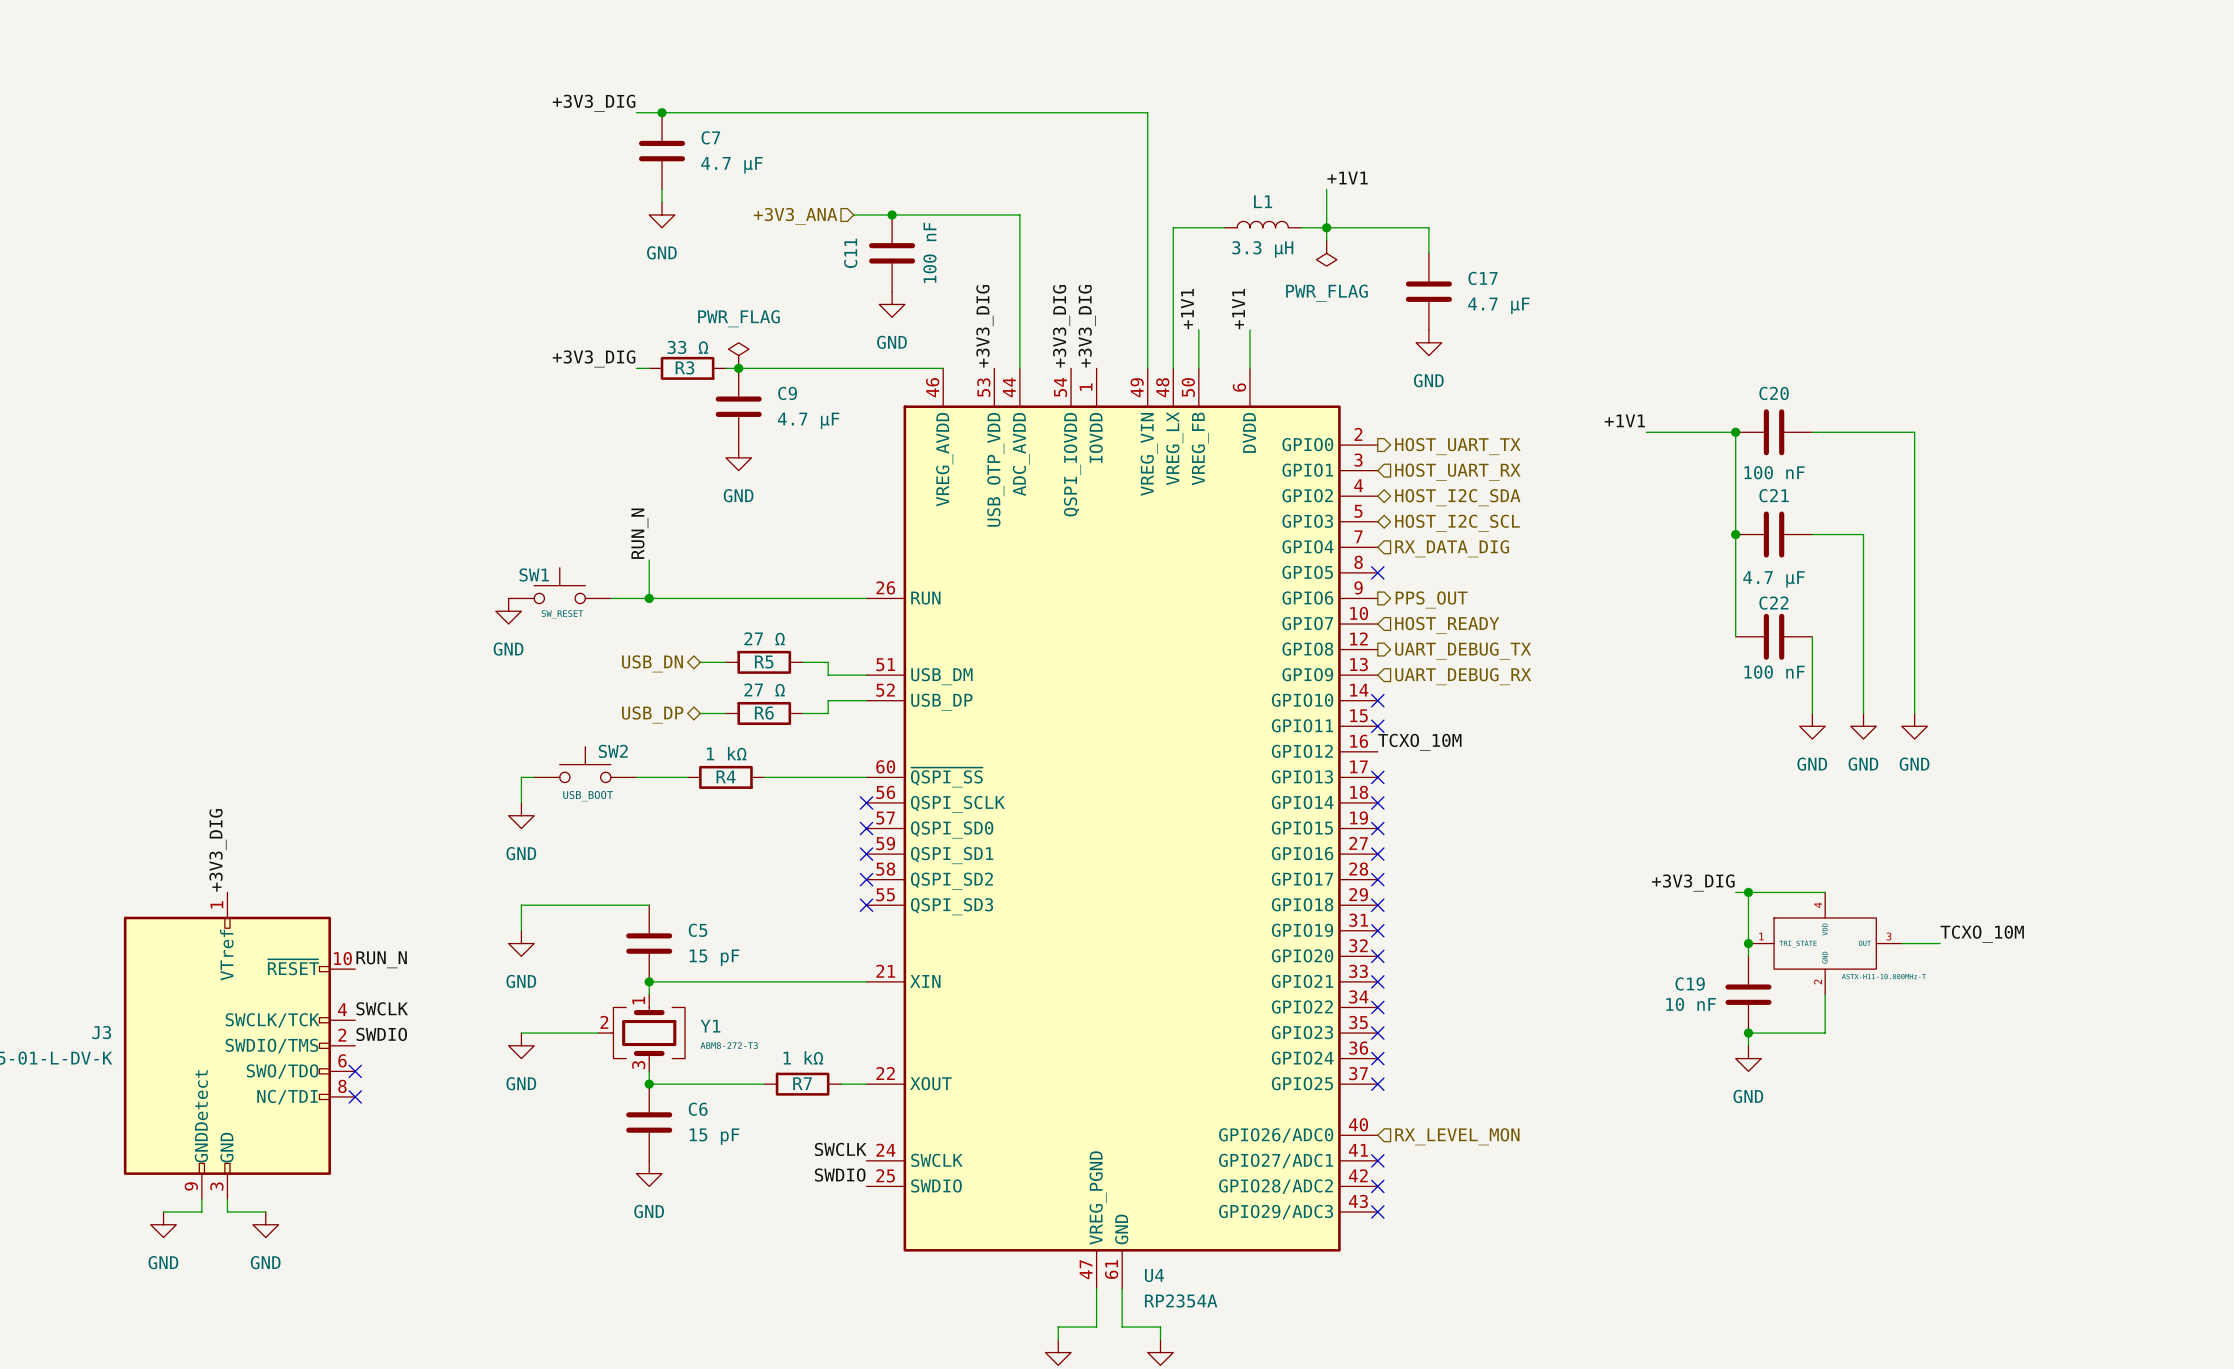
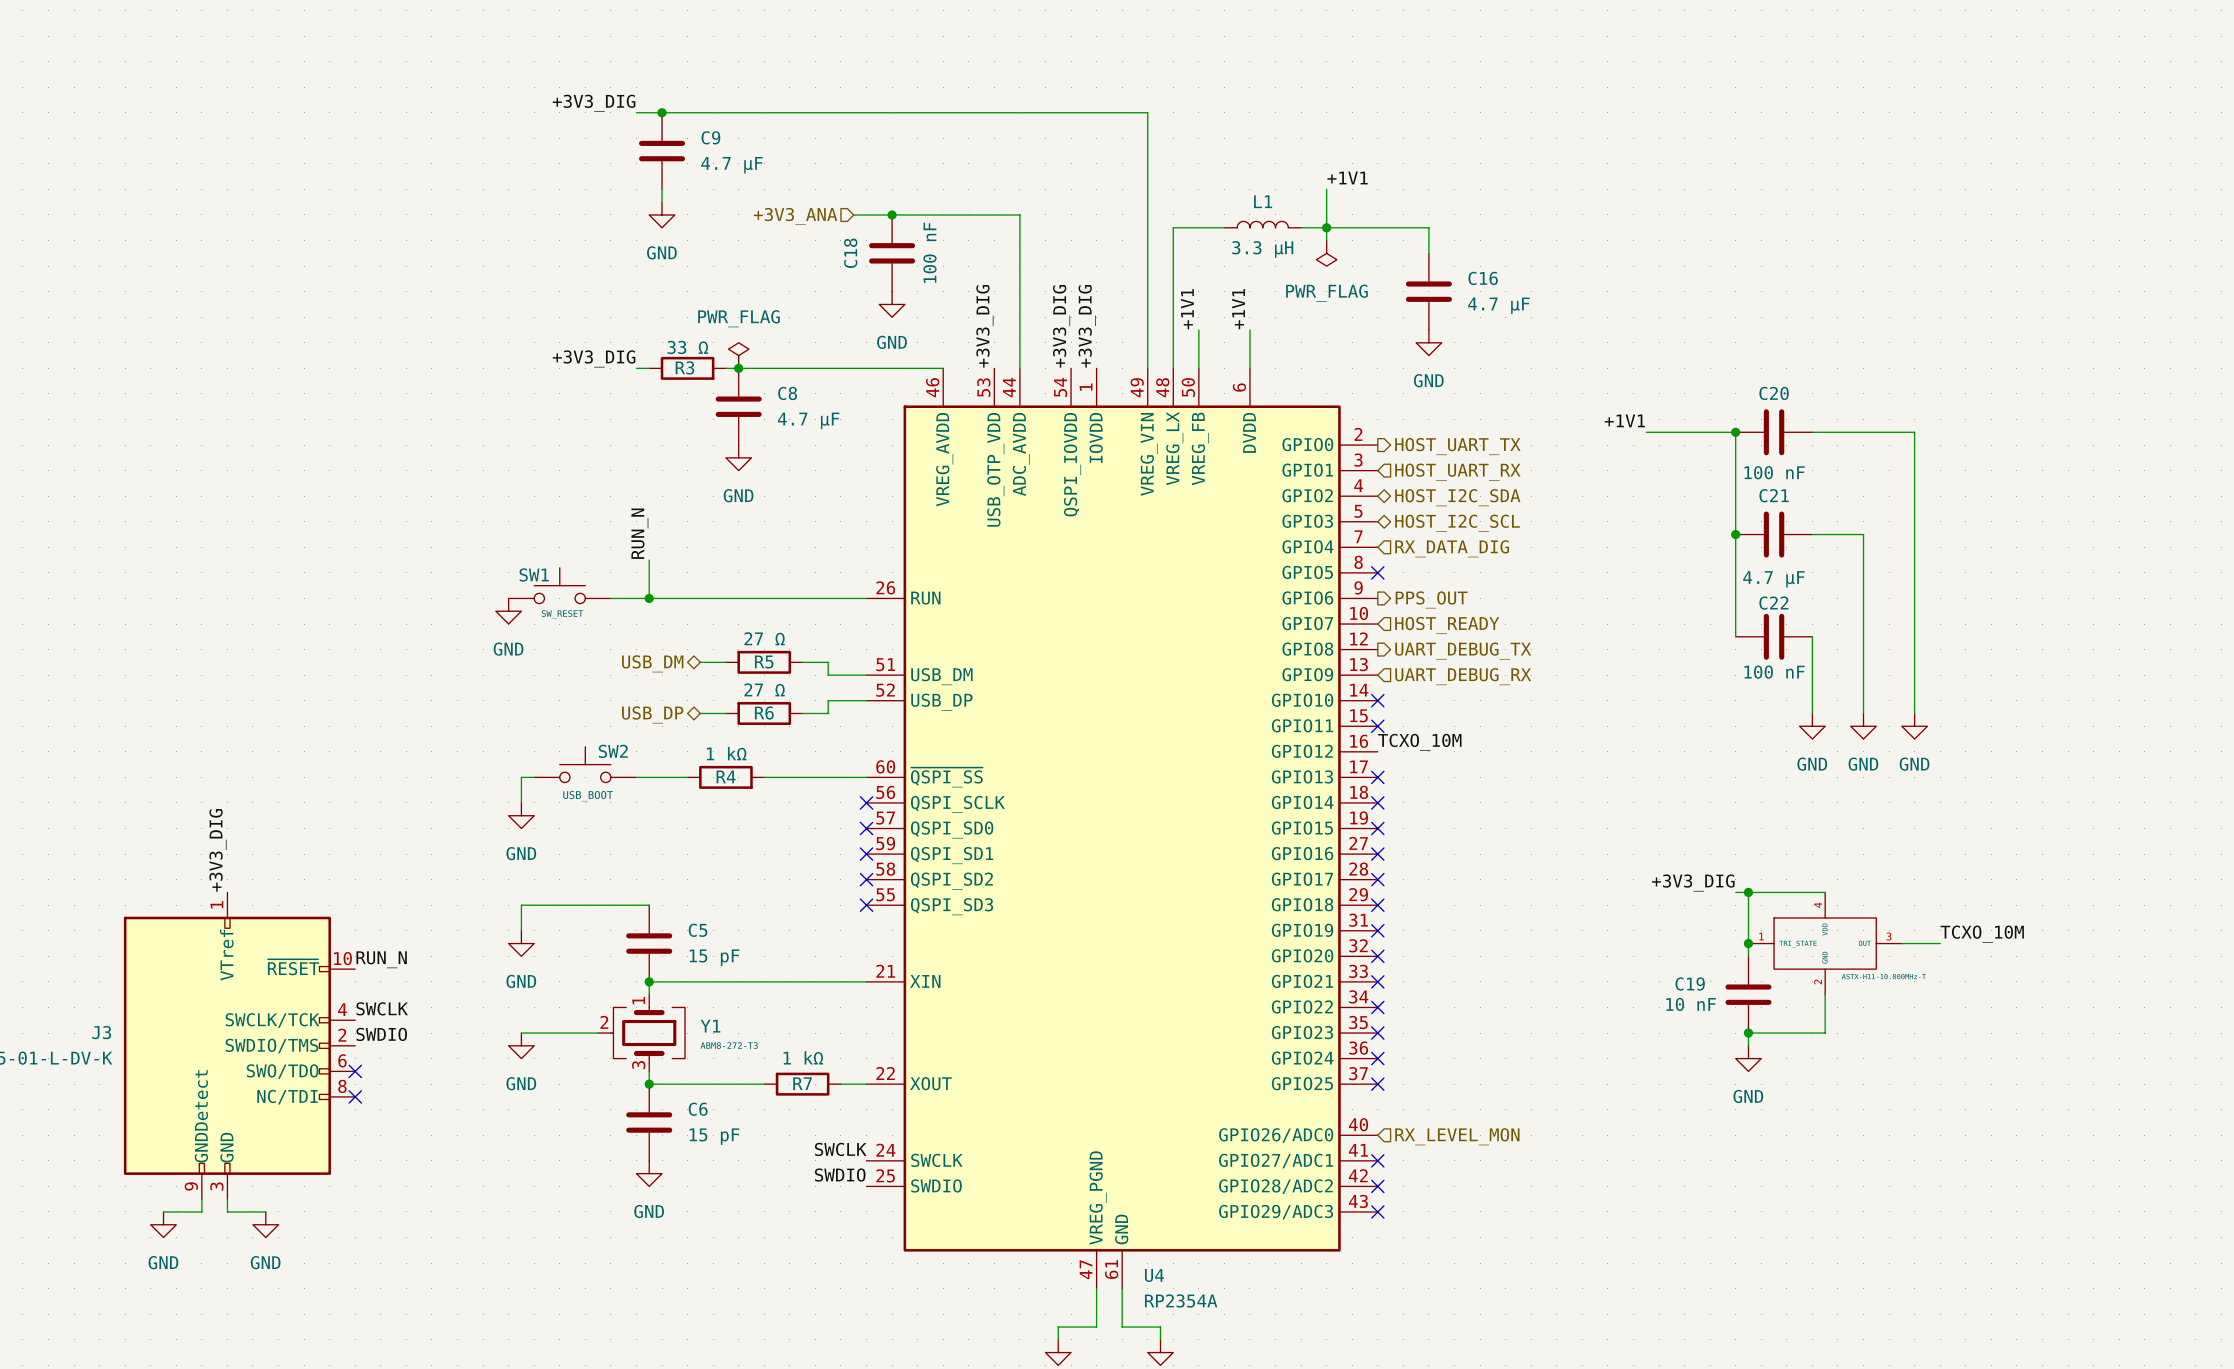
C7 name: C7 (710, 137) -> C9 (710, 137)
C11 name: C11 (850, 253) -> C18 (850, 253)
C17 name: C17 (1483, 278) -> C16 (1483, 278)
C9 name: C9 (787, 393) -> C8 (787, 393)
hierarchical label: USB_DN (652, 663) -> USB_DM (652, 663)

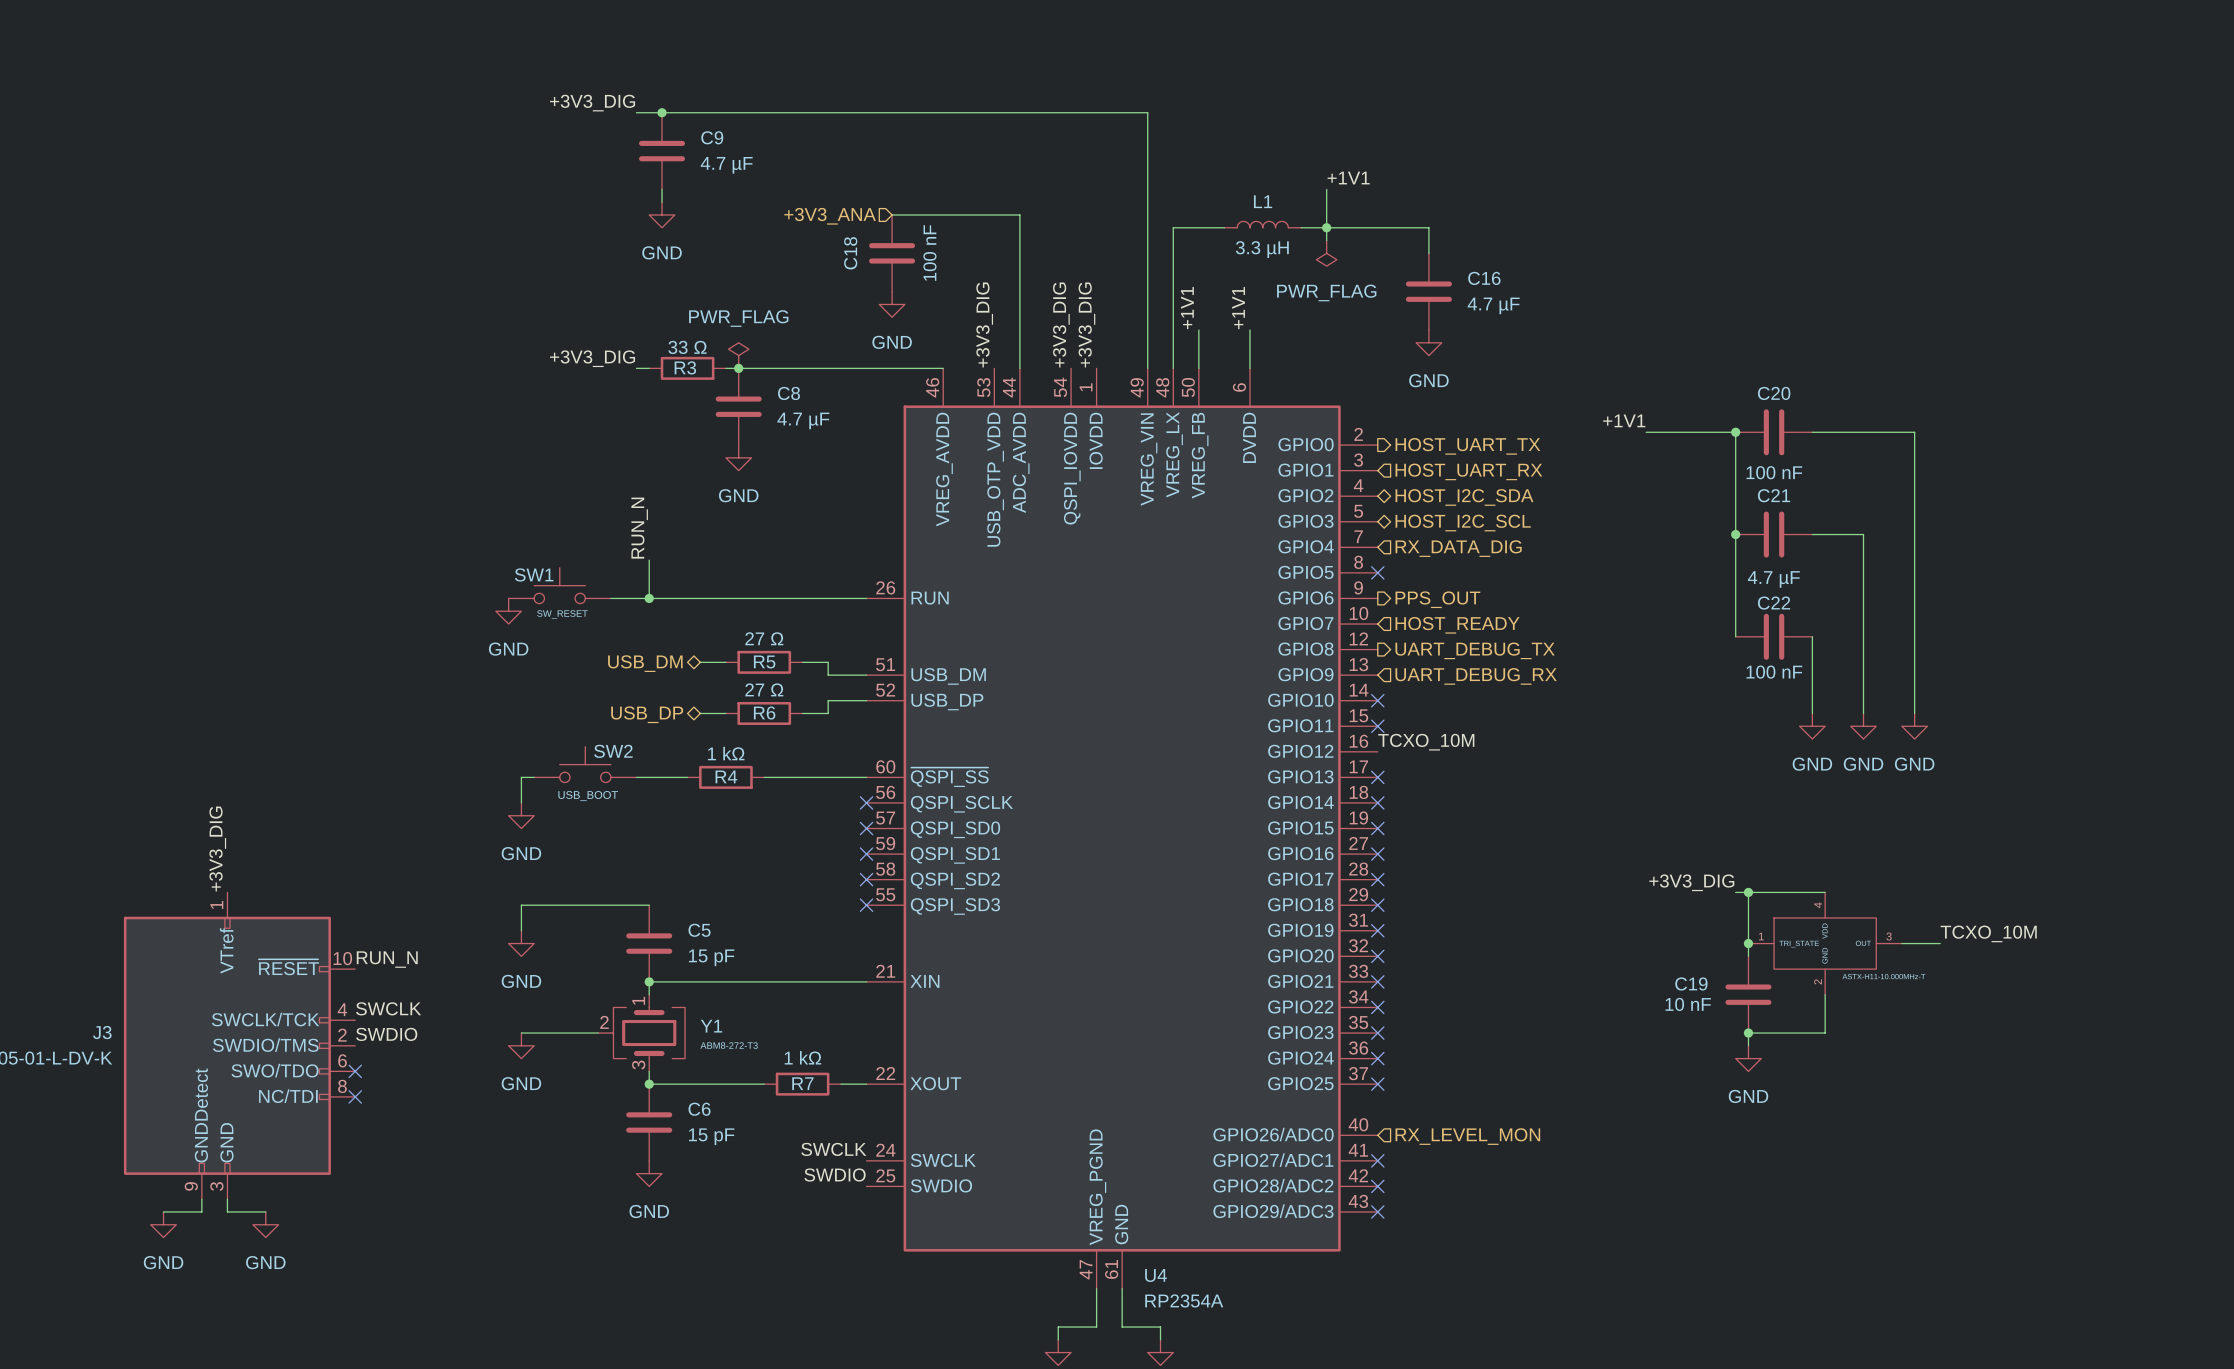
wire: (853, 214) (892, 214) -> none
junction: (892, 214) -> none
hierarchical label position: +3V3_ANA (795, 216) -> +3V3_ANA (830, 216)

